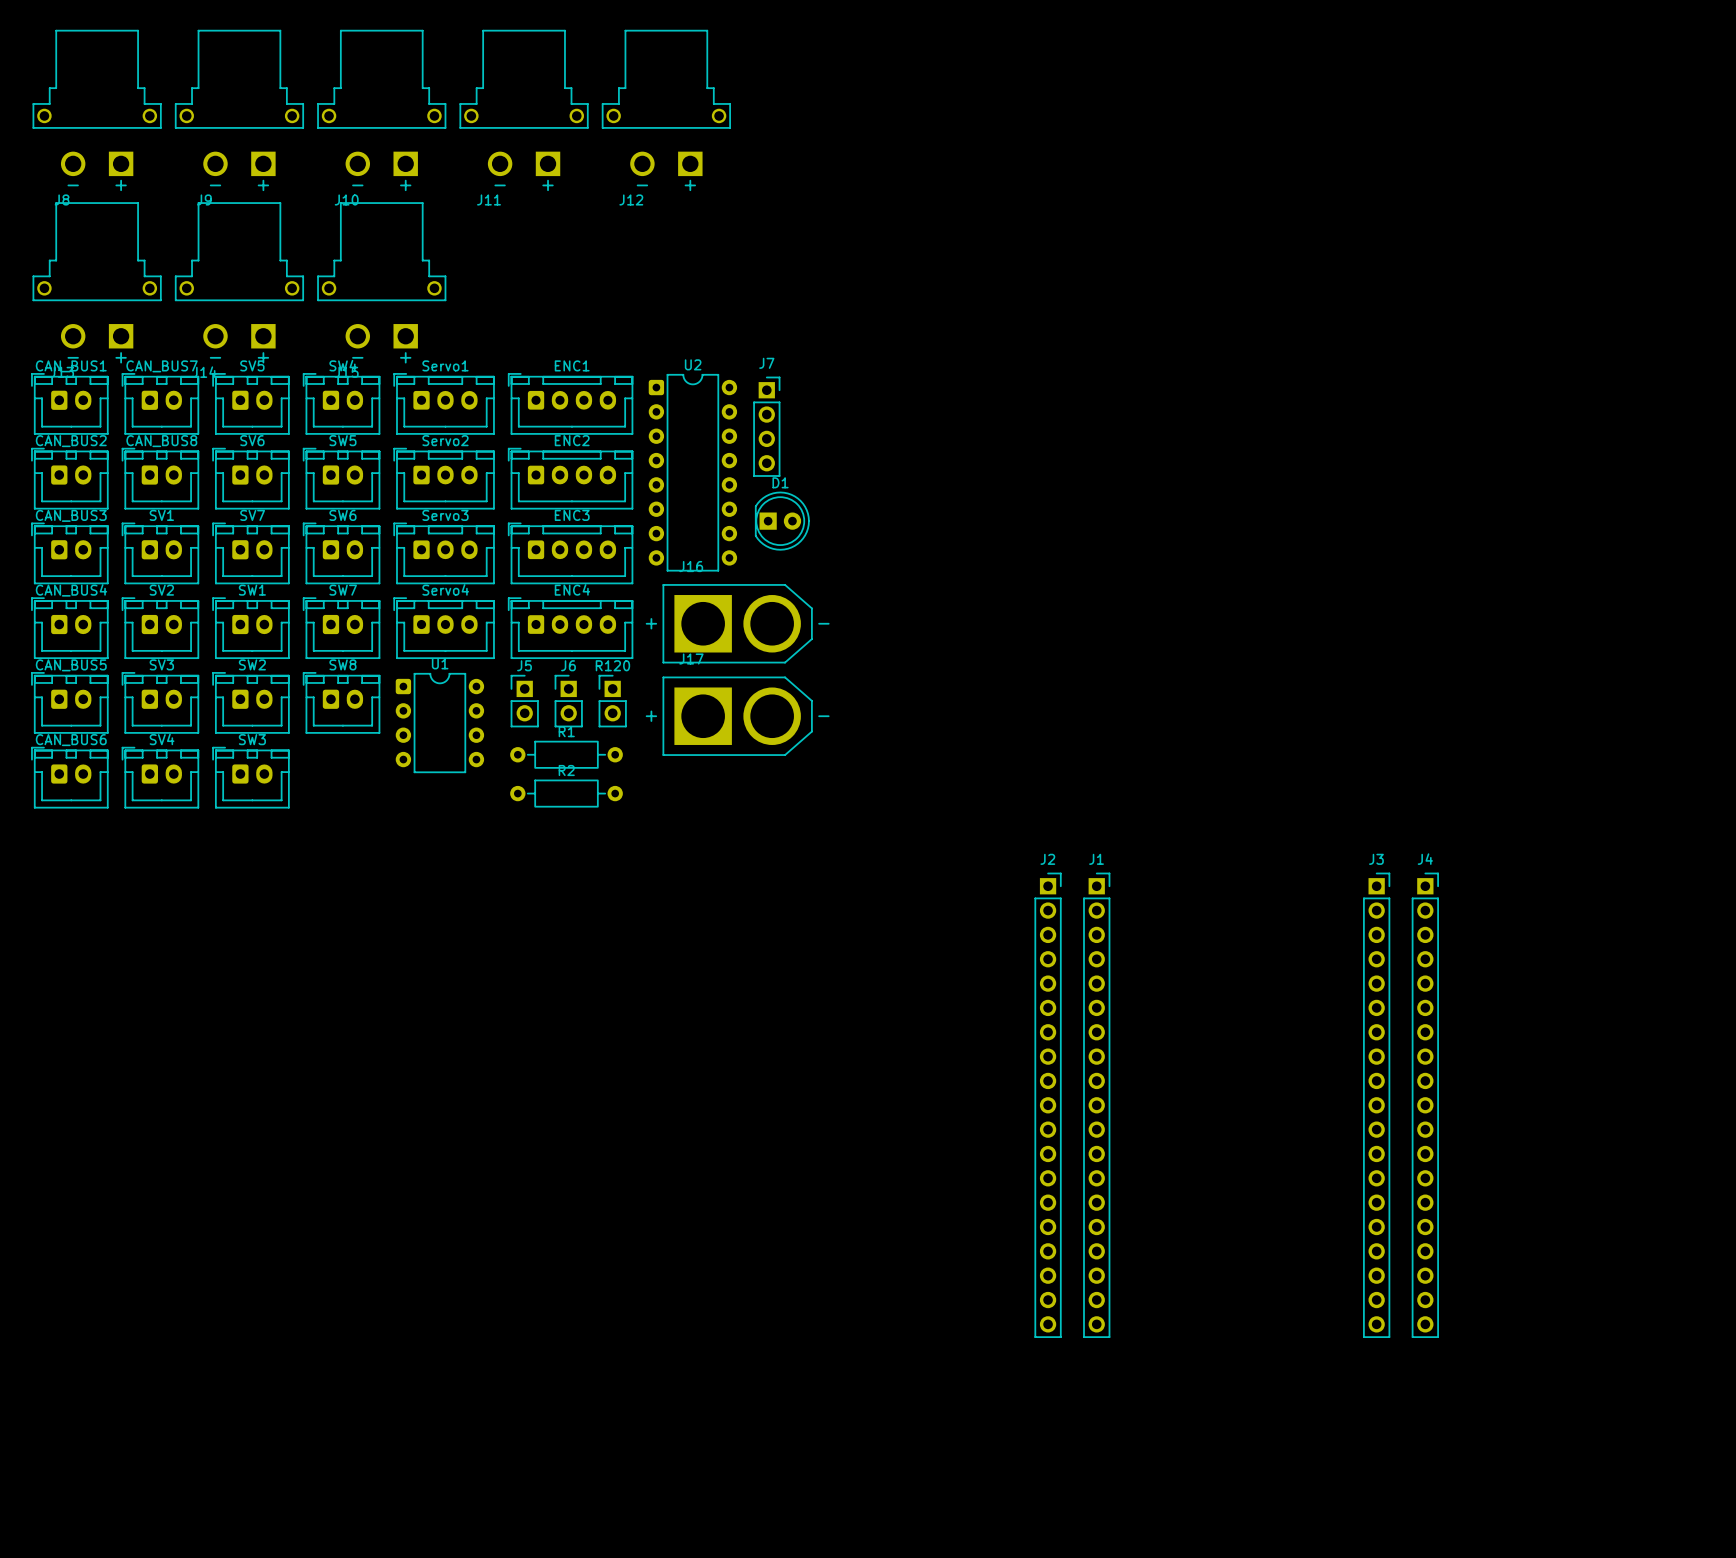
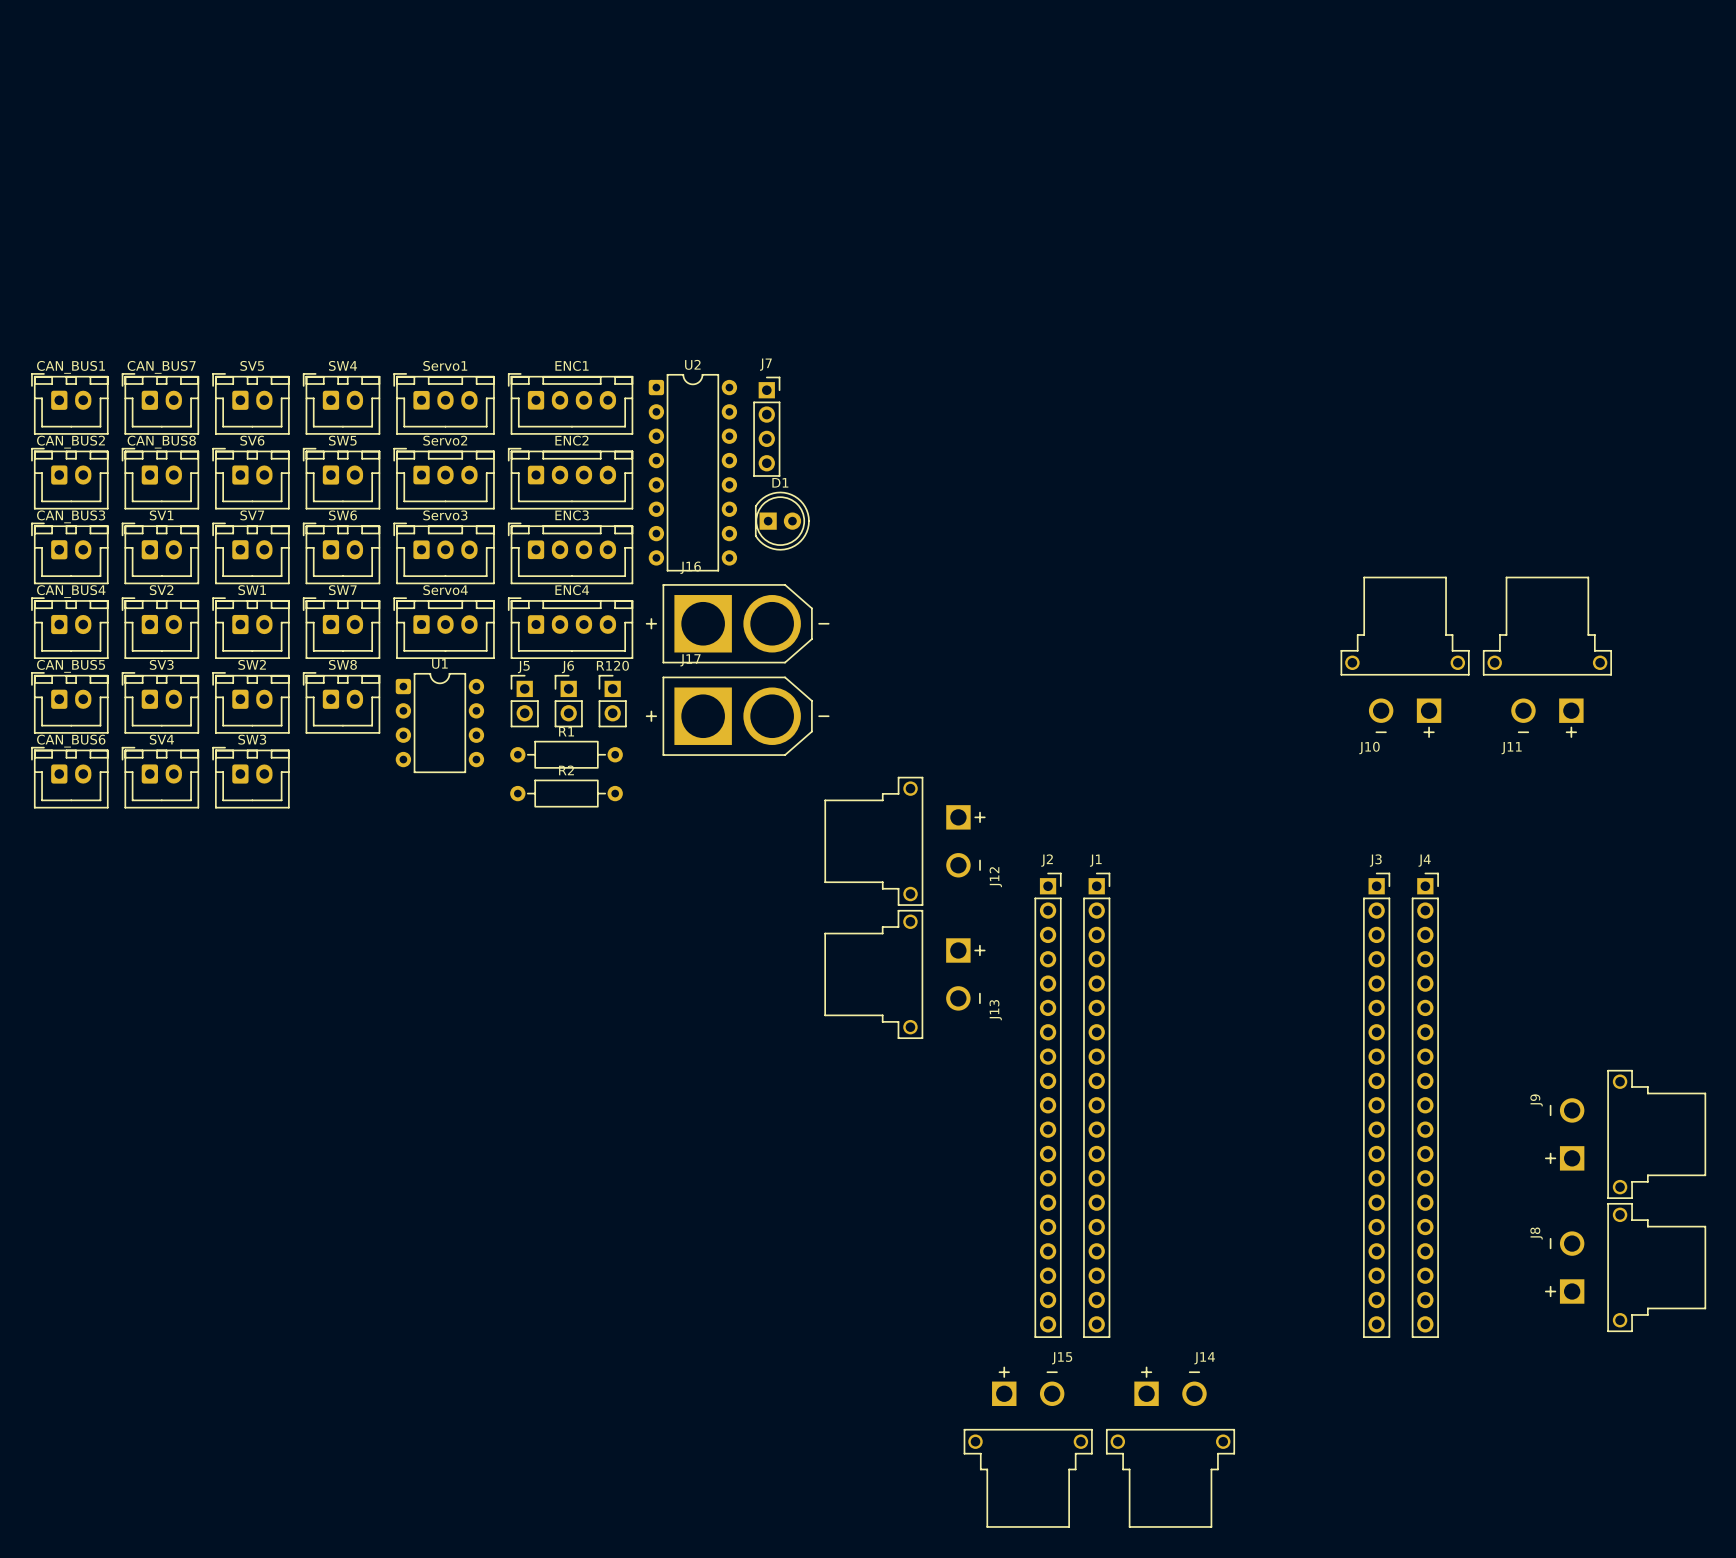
J8 rotation: 0° (97, 110) -> 90° clockwise (1625, 1267)
J8 position: (97, 110) -> (1625, 1267)
J9 rotation: 0° (239, 110) -> 90° clockwise (1625, 1134)
J9 position: (239, 110) -> (1625, 1134)
J10 position: (381, 110) -> (1405, 657)
J11 position: (524, 110) -> (1547, 657)
J12 rotation: 0° (666, 110) -> 90° counterclockwise (905, 841)
J12 position: (666, 110) -> (905, 841)
J13 rotation: 0° (97, 282) -> 90° counterclockwise (904, 974)
J13 position: (97, 282) -> (904, 974)
J14 rotation: 0° (239, 282) -> 180° (1170, 1447)
J14 position: (239, 282) -> (1170, 1447)
J15 rotation: 0° (381, 282) -> 180° (1028, 1447)
J15 position: (381, 282) -> (1028, 1447)

